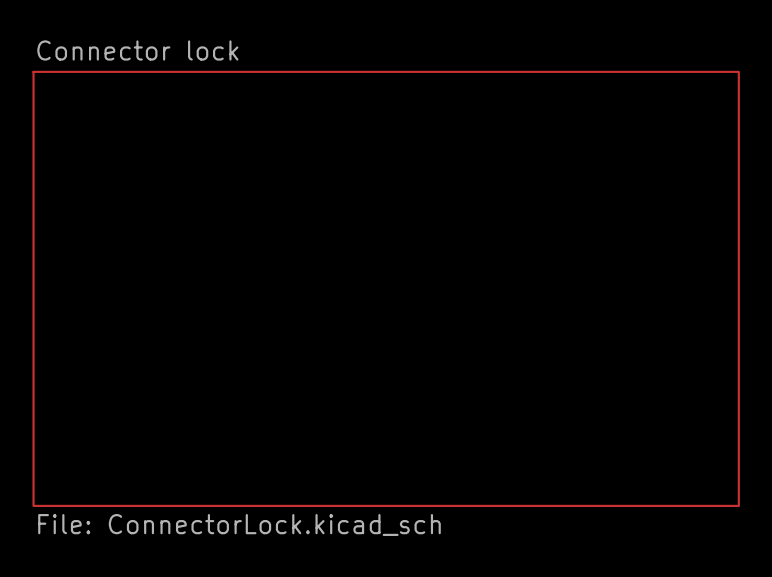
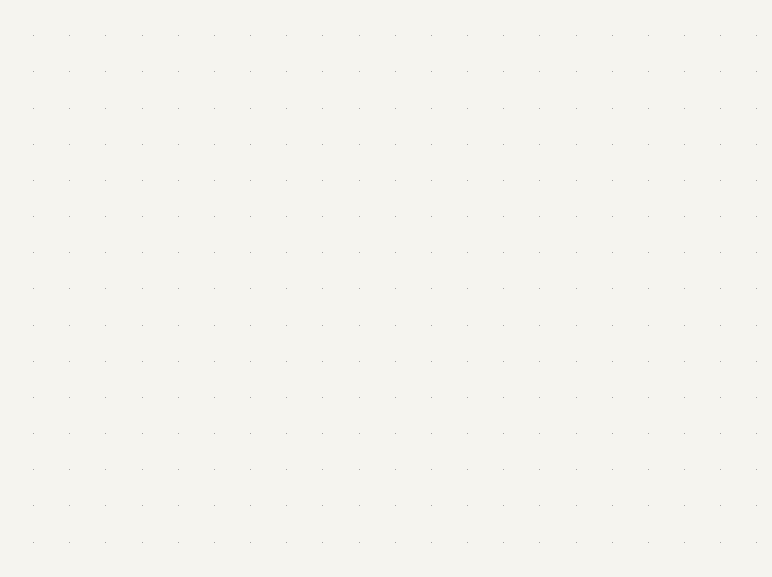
sheet Connector lock: File: ConnectorLock.kicad_sch (386, 288) -> none

